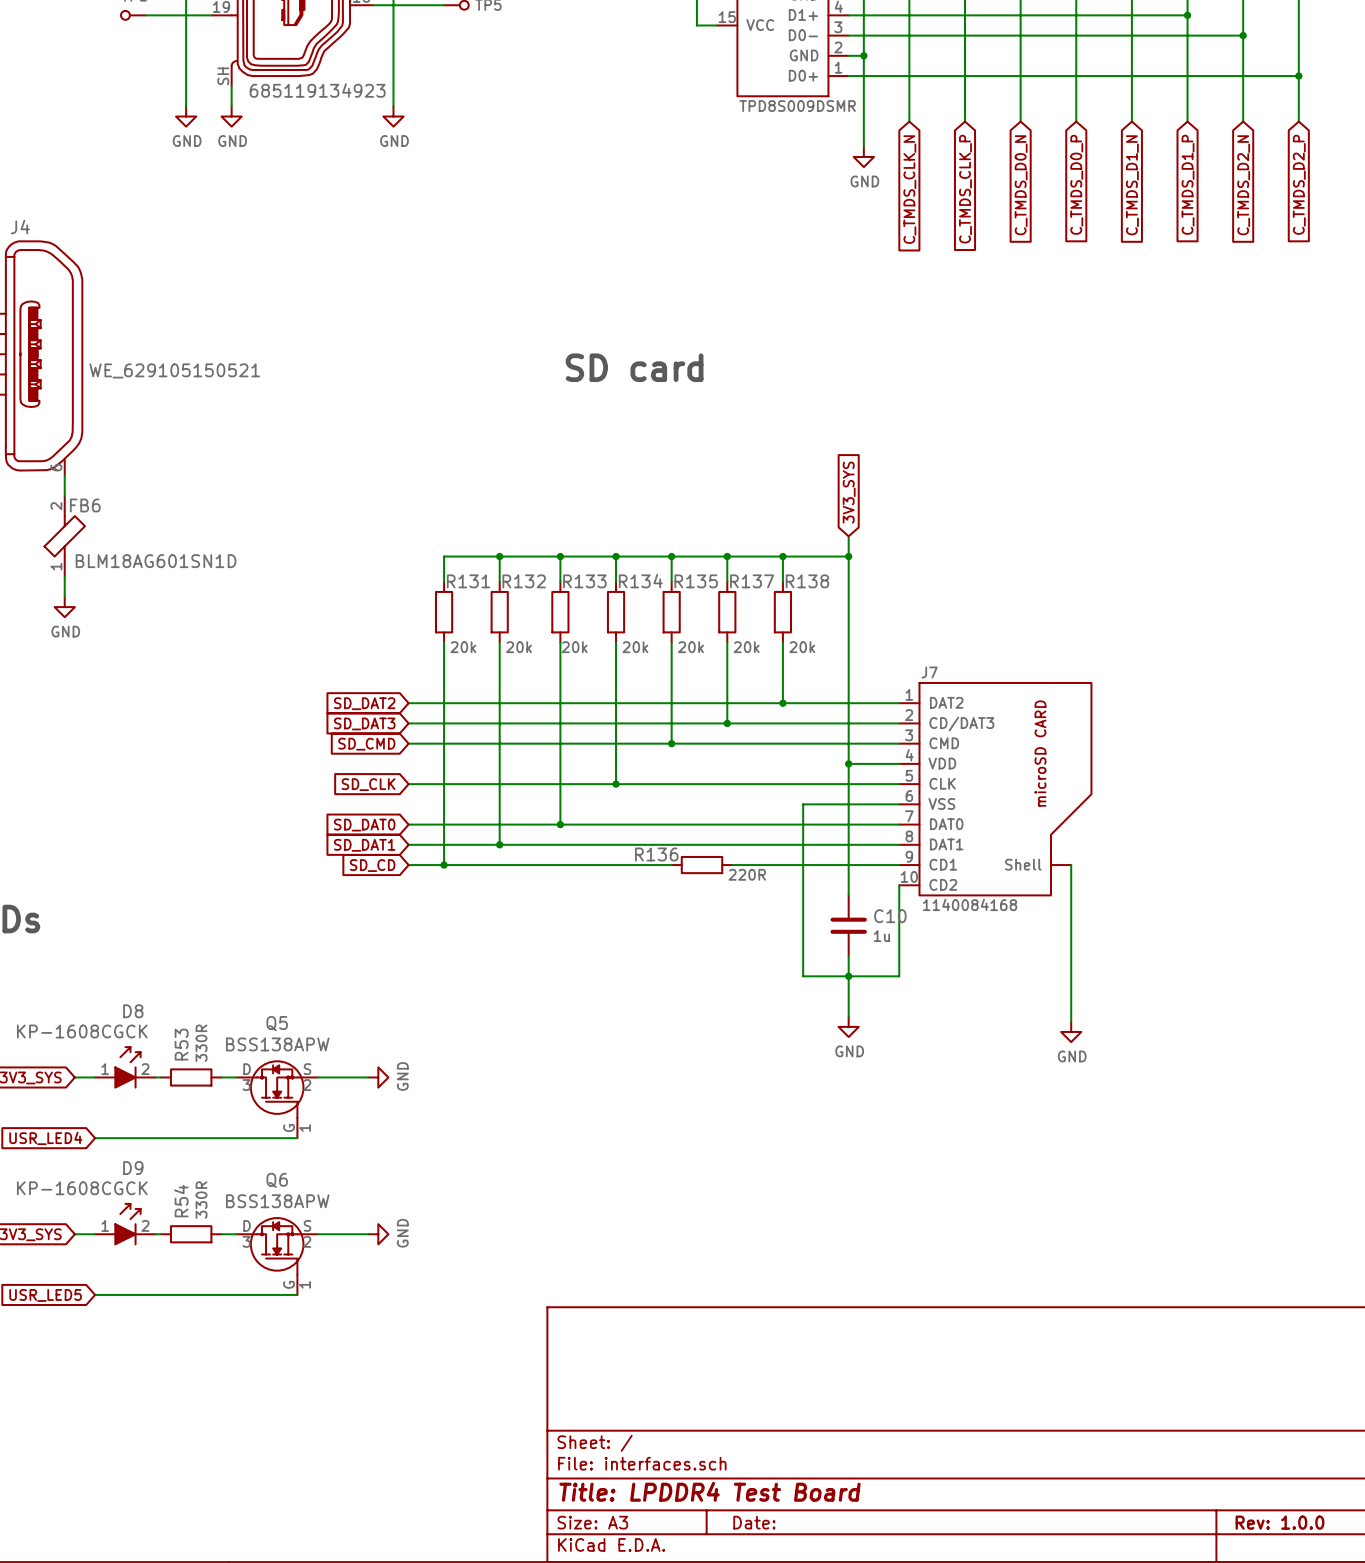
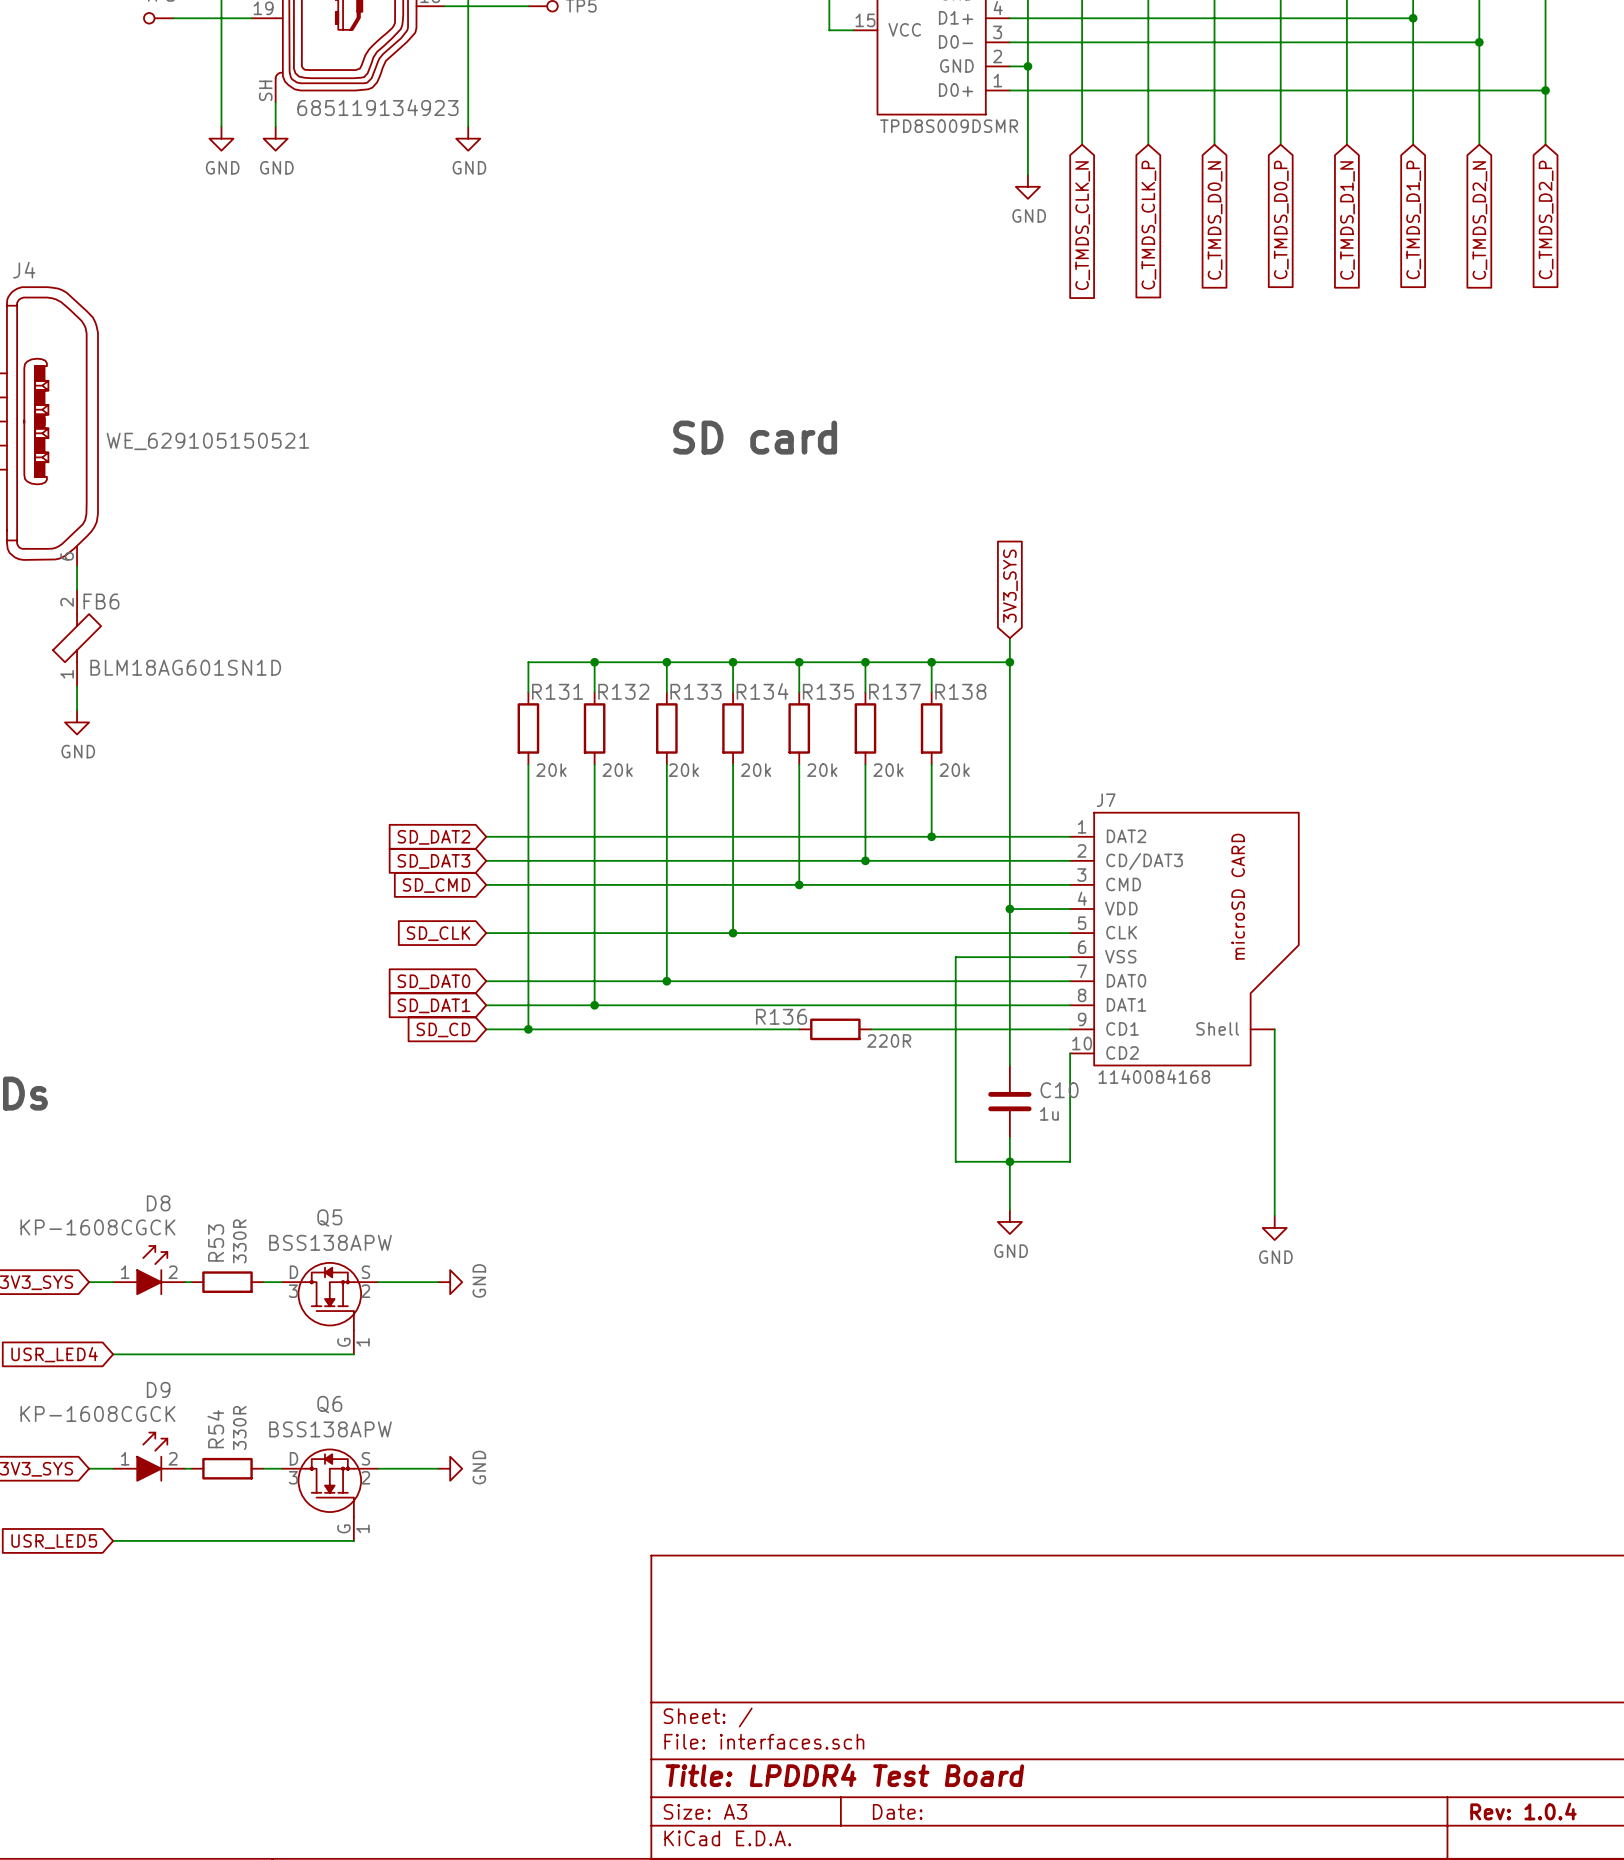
title block: Rev: 1.0.0 (1279, 1522) -> Rev: 1.0.4 (1523, 1811)

